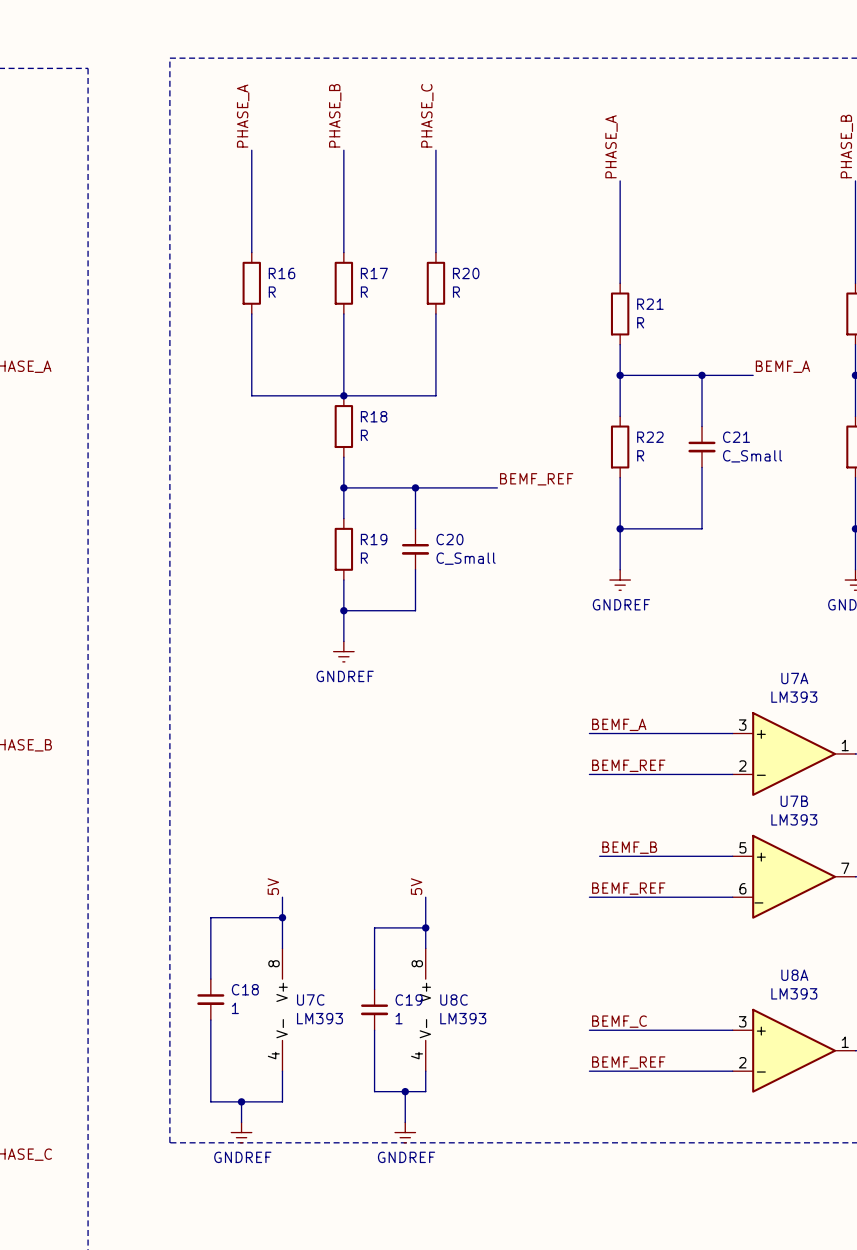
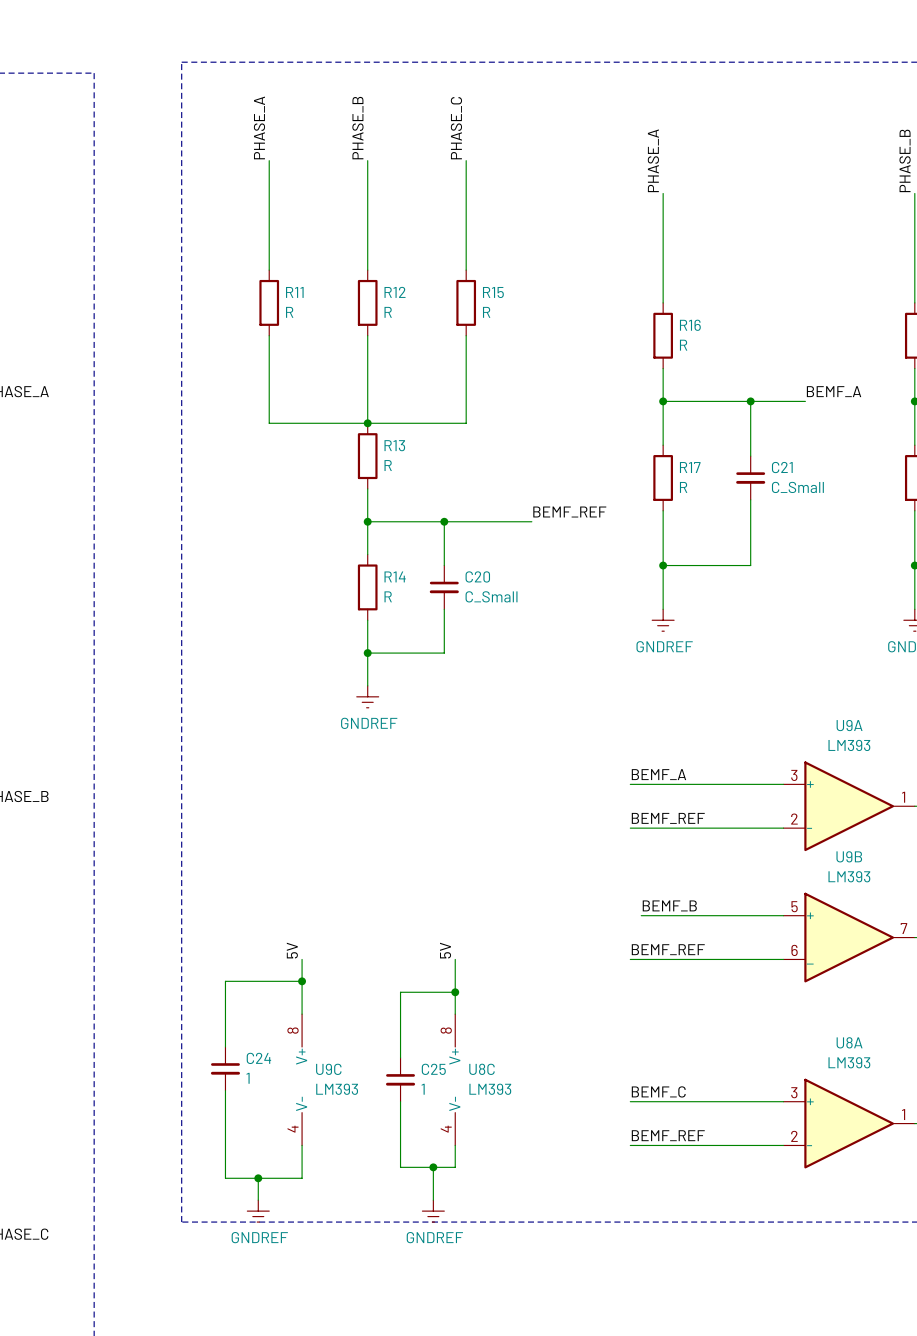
R16 name: R16 (282, 273) -> R11 (294, 292)
R17 name: R17 (374, 273) -> R12 (395, 292)
R20 name: R20 (466, 273) -> R15 (493, 292)
R21 name: R21 (650, 304) -> R16 (690, 325)
R18 name: R18 (374, 416) -> R13 (394, 445)
R22 name: R22 (650, 437) -> R17 (690, 467)
R19 name: R19 (374, 539) -> R14 (395, 576)
U7A name: U7A (794, 678) -> U9A (849, 725)
U7B name: U7B (794, 801) -> U9B (849, 856)
C18 name: C18 (245, 989) -> C24 (258, 1058)
U7C name: U7C (310, 999) -> U9C (328, 1069)
C19 name: C19 (409, 999) -> C25 (433, 1069)

